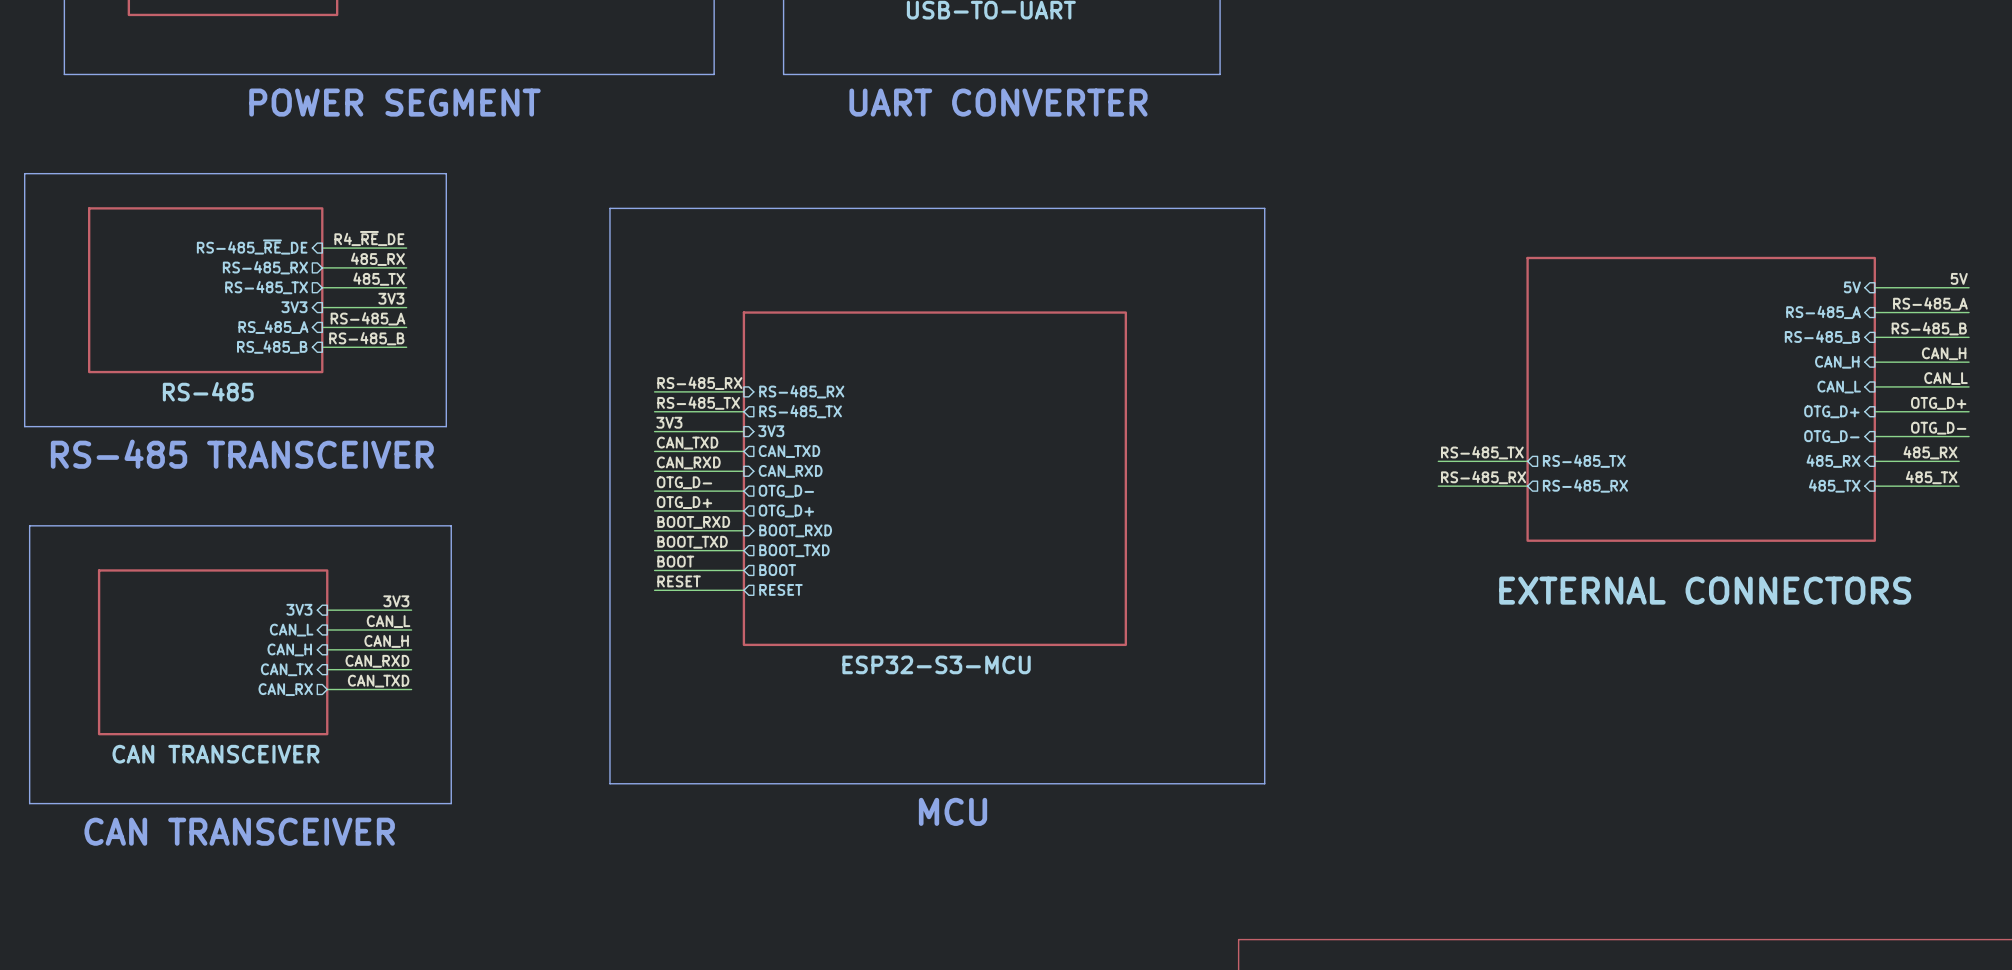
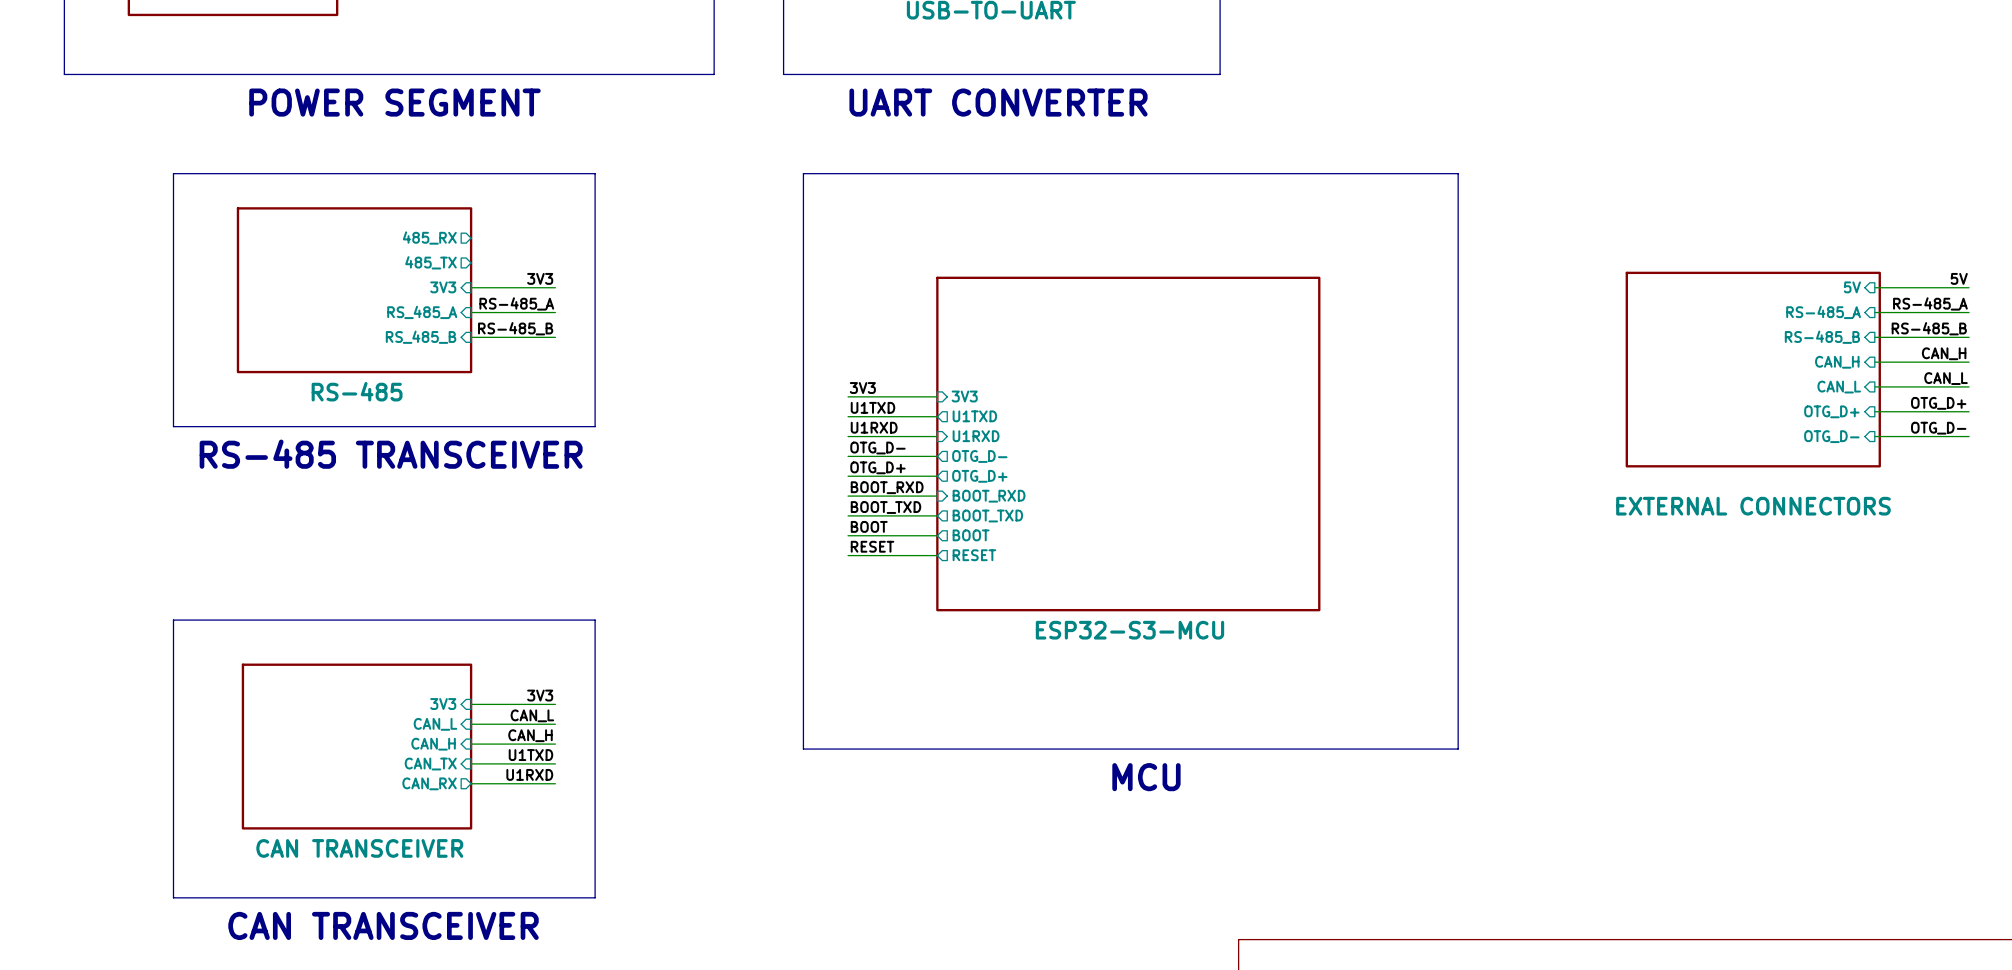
bus: (173, 173) (24, 173) (24, 426) (173, 426) -> (173, 173) (173, 426)
bus: (446, 173) (446, 426) -> (446, 173) (595, 173) (595, 426) (446, 426)
bus: none -> (803, 173) (1458, 173) (1458, 749) (803, 749) (803, 173)
bus: (609, 208) (1264, 208) (1264, 783) (609, 783) (609, 208) -> none
label: R4_~{RE}_DE (369, 238) -> none
sheet pin: none -> 485_RX (429, 238)
sheet pin: RS-485_~{RE}_DE (252, 247) -> none
wire: (322, 248) (406, 248) -> none
label: 485_RX (377, 259) -> none
sheet pin: none -> 485_TX (430, 262)
sheet pin: RS-485_RX (265, 267) -> none
wire: (322, 267) (406, 267) -> none
label: none -> 3V3 (540, 278)
label: 485_TX (379, 279) -> none
sheet pin: RS-485_TX (266, 287) -> none
wire: (322, 287) (406, 287) -> (471, 287) (555, 287)
sheet RS-485 position: (205, 290) -> (354, 290)
label: 3V3 (391, 298) -> none
sheet pin position: 3V3 (294, 307) -> 3V3 (443, 287)
wire: (322, 307) (406, 307) -> (471, 312) (555, 312)
label position: RS-485_A (367, 318) -> RS-485_A (516, 303)
sheet pin position: RS_485_A (273, 327) -> RS_485_A (422, 312)
wire: (322, 327) (406, 327) -> (471, 337) (555, 337)
label position: RS-485_B (366, 338) -> RS-485_B (515, 328)
sheet pin position: RS_485_B (272, 347) -> RS_485_B (421, 337)
wire: (322, 347) (406, 347) -> none
sheet EXTERNAL CONNECTORS: none -> (1753, 369)
label: RS-485_RX (699, 383) -> none
label: none -> 3V3 (862, 388)
wire: (654, 391) (743, 391) -> (848, 396) (937, 396)
sheet pin: RS-485_RX (801, 391) -> none
sheet pin: none -> 3V3 (964, 396)
sheet EXTERNAL CONNECTORS: (1701, 399) -> none
label: RS-485_TX (698, 403) -> none
label: none -> U1TXD (872, 407)
wire: (654, 411) (743, 411) -> (848, 416) (937, 416)
sheet pin: RS-485_TX (800, 411) -> none
sheet pin: none -> U1TXD (974, 416)
label: 3V3 (669, 422) -> none
label: none -> U1RXD (874, 427)
wire: (654, 431) (743, 431) -> (848, 436) (937, 436)
sheet pin: 3V3 (771, 431) -> none
sheet pin: none -> U1RXD (976, 436)
label: CAN_TXD (687, 443) -> none
label: none -> OTG_D- (877, 448)
wire: (654, 451) (743, 451) -> (848, 456) (937, 456)
sheet pin: CAN_TXD (789, 451) -> none
label: RS-485_TX (1482, 452) -> none
label: 485_RX (1930, 452) -> none
text position: RS-485 TRANSCEIVER (242, 454) -> RS-485 TRANSCEIVER (391, 454)
sheet pin: none -> OTG_D- (979, 456)
wire: (1438, 461) (1527, 461) -> none
sheet pin: RS-485_TX (1584, 461) -> none
sheet pin: 485_RX (1833, 461) -> none
wire: (1874, 461) (1959, 461) -> none
label: CAN_RXD (688, 462) -> none
label: none -> OTG_D+ (877, 467)
wire: (654, 471) (743, 471) -> (848, 476) (937, 476)
sheet pin: CAN_RXD (790, 471) -> none
sheet pin: none -> OTG_D+ (979, 476)
label: RS-485_RX (1483, 477) -> none
label: 485_TX (1931, 477) -> none
sheet ESP32-S3-MCU position: (934, 478) -> (1128, 443)
label: OTG_D- (684, 482) -> none
wire: (1438, 486) (1527, 486) -> none
sheet pin: RS-485_RX (1585, 486) -> none
sheet pin: 485_TX (1834, 486) -> none
wire: (1874, 486) (1959, 486) -> none
label: none -> BOOT_RXD (887, 487)
wire: (654, 491) (743, 491) -> (848, 496) (937, 496)
sheet pin: OTG_D- (786, 491) -> none
sheet pin: none -> BOOT_RXD (989, 496)
label: OTG_D+ (684, 502) -> none
label: none -> BOOT_TXD (885, 507)
wire: (654, 510) (743, 510) -> (848, 515) (937, 515)
sheet pin: OTG_D+ (786, 511) -> none
sheet pin: none -> BOOT_TXD (987, 516)
label: BOOT_RXD (693, 522) -> none
bus: (29, 525) (29, 803) (451, 803) (451, 525) (29, 525) -> (173, 620) (173, 897) (595, 897) (595, 620) (173, 620)
label: none -> BOOT (869, 526)
wire: (654, 530) (743, 530) -> (848, 535) (937, 535)
sheet pin: BOOT_RXD (795, 530) -> none
sheet pin: none -> BOOT (971, 535)
label: BOOT_TXD (692, 542) -> none
label: none -> RESET (872, 546)
wire: (654, 550) (743, 550) -> (848, 555) (937, 555)
sheet pin: BOOT_TXD (794, 550) -> none
sheet pin: none -> RESET (974, 555)
label: BOOT (675, 561) -> none
wire: (654, 570) (743, 570) -> none
sheet pin: BOOT (777, 570) -> none
label: RESET (679, 581) -> none
sheet pin: RESET (780, 589) -> none
wire: (654, 590) (743, 590) -> none
label: 3V3 (396, 601) -> none
sheet pin position: 3V3 (299, 609) -> 3V3 (443, 704)
wire: (327, 610) (411, 610) -> (471, 704) (555, 704)
label position: CAN_L (388, 621) -> CAN_L (532, 715)
wire: (327, 629) (411, 629) -> (471, 724) (555, 724)
sheet pin position: CAN_L (291, 630) -> CAN_L (435, 724)
label position: CAN_H (386, 641) -> CAN_H (530, 735)
sheet pin position: CAN_H (289, 649) -> CAN_H (433, 744)
wire: (327, 649) (411, 649) -> (471, 744) (555, 744)
sheet CAN TRANSCEIVER position: (213, 652) -> (357, 746)
label: CAN_RXD (377, 661) -> none
sheet pin position: CAN_TX (286, 669) -> CAN_TX (430, 764)
wire: (327, 669) (411, 669) -> (471, 763) (555, 763)
label: CAN_TXD (378, 681) -> none
sheet pin position: CAN_RX (285, 689) -> CAN_RX (429, 783)
wire: (327, 689) (411, 689) -> (471, 783) (555, 783)
label: none -> 3V3 (540, 695)
label: none -> U1TXD (530, 755)
label: none -> U1RXD (529, 774)
text: none -> MCU (1146, 777)
text: MCU (953, 811) -> none
text position: CAN TRANSCEIVER (239, 831) -> CAN TRANSCEIVER (383, 925)

